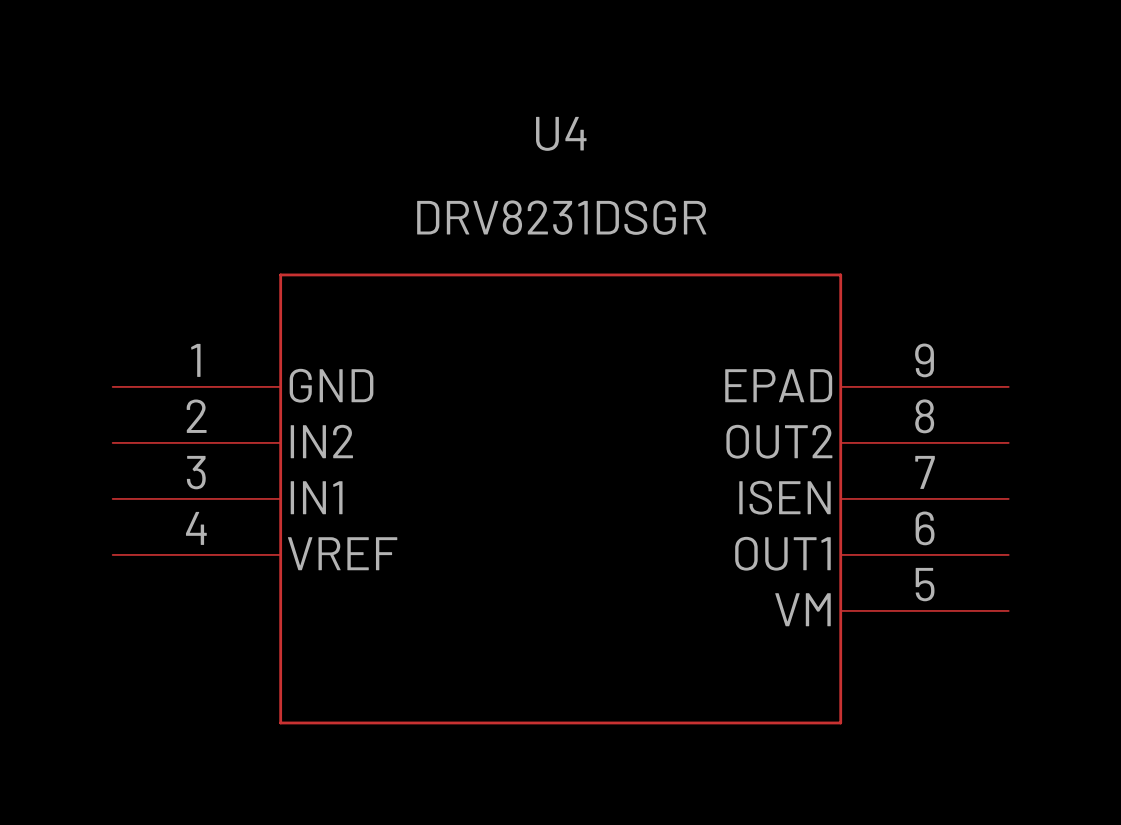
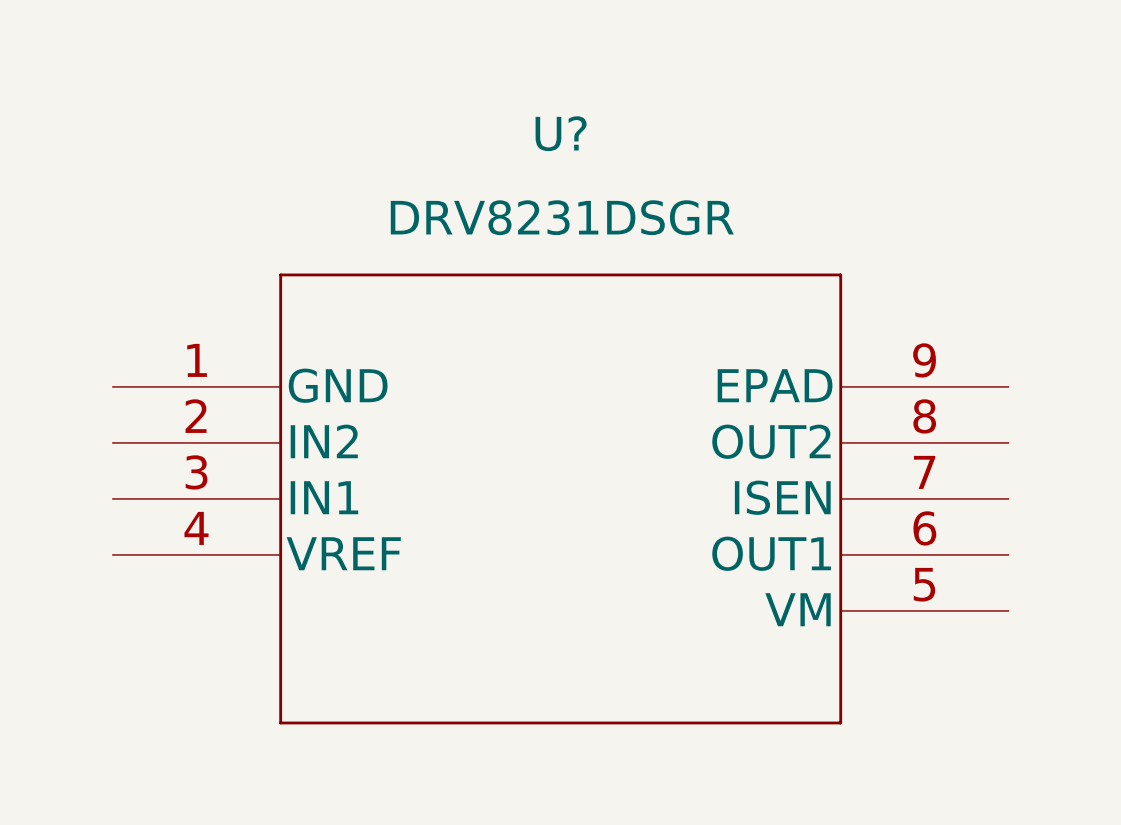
U4 name: U4 (561, 133) -> U? (561, 133)

